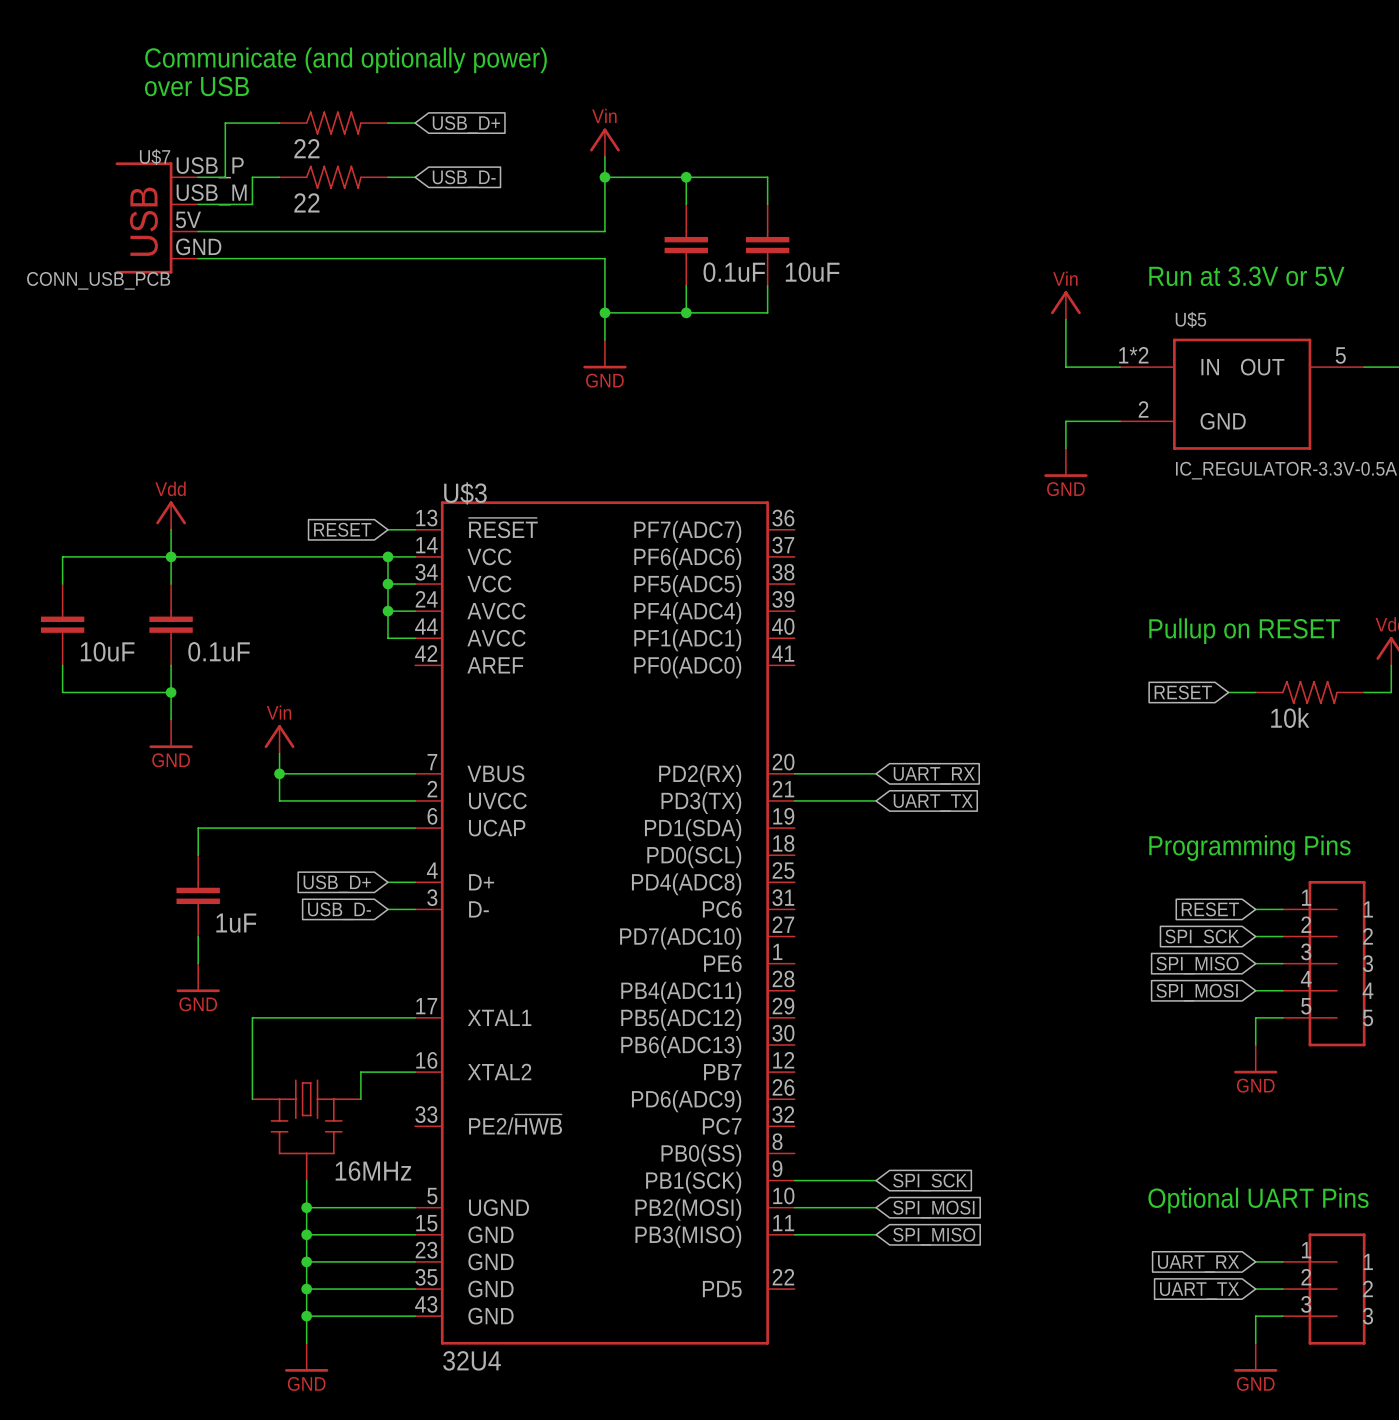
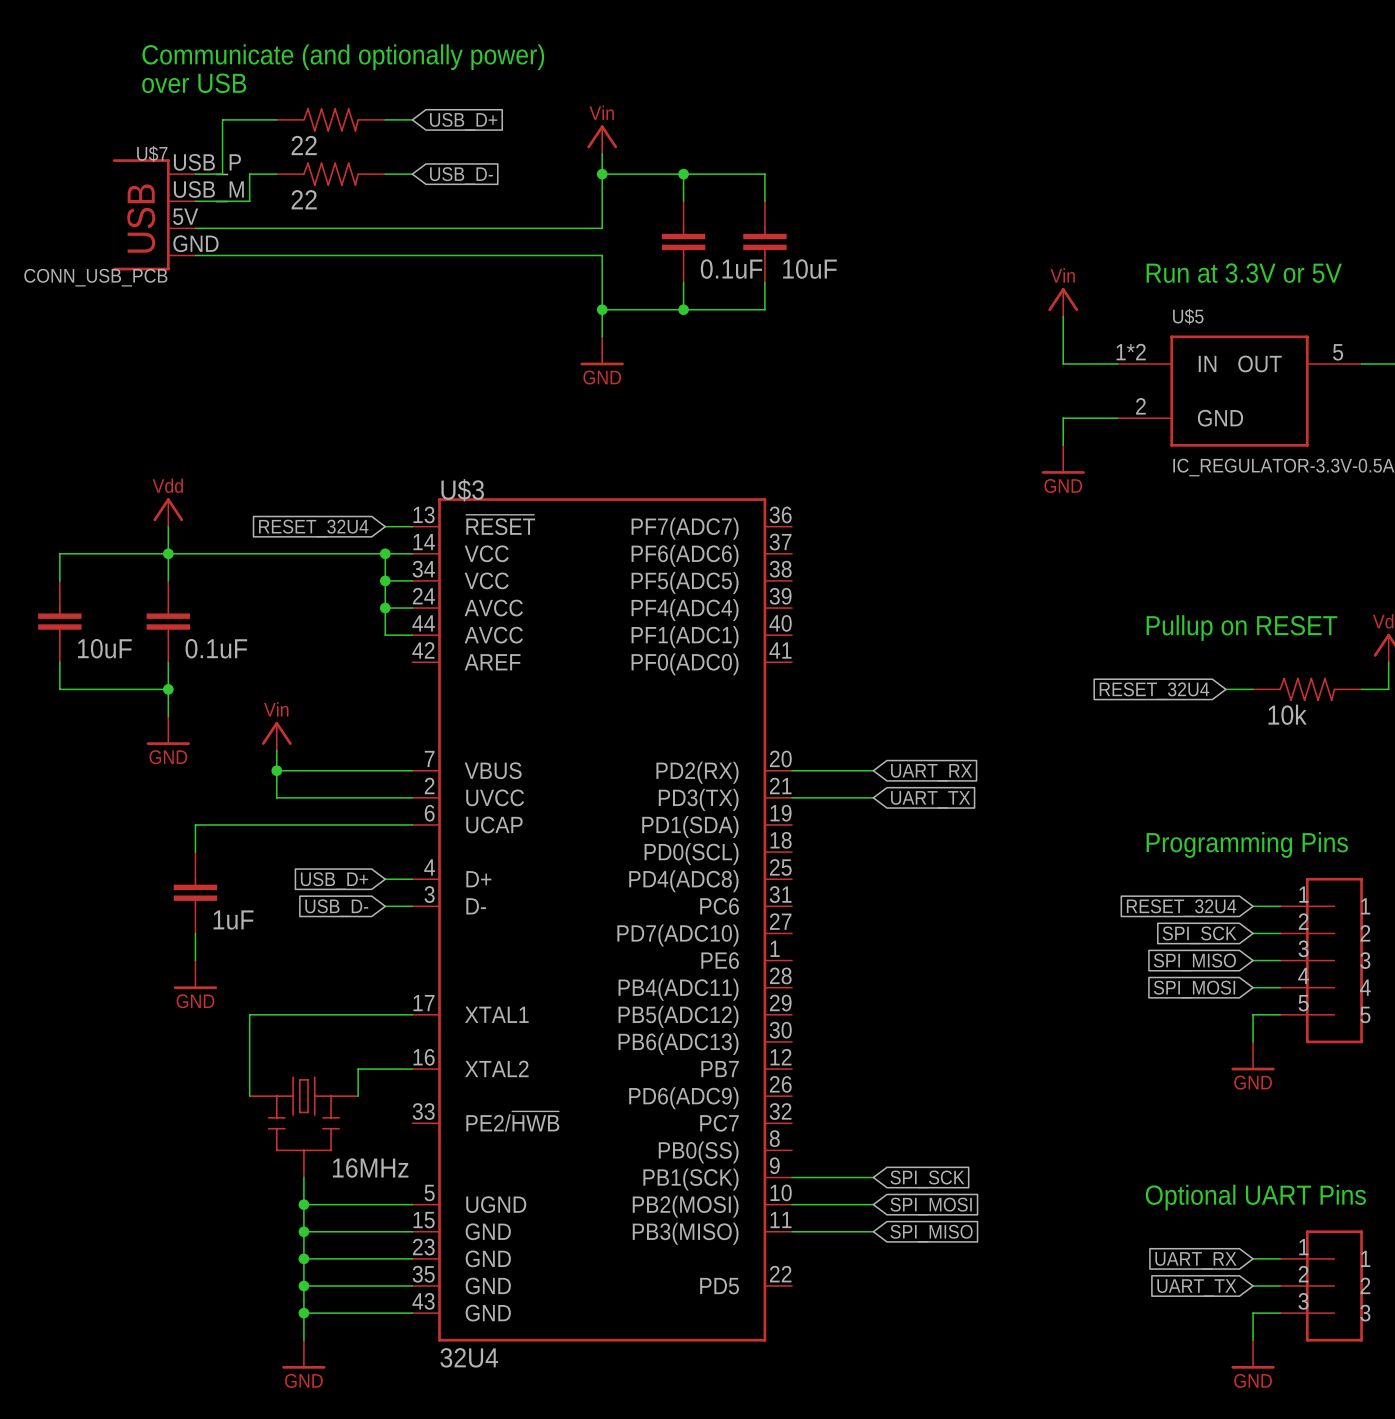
global label: RESET (342, 529) -> RESET_32U4 (313, 528)
global label: RESET (1183, 692) -> RESET_32U4 (1154, 691)
global label: RESET (1210, 909) -> RESET_32U4 (1181, 908)

